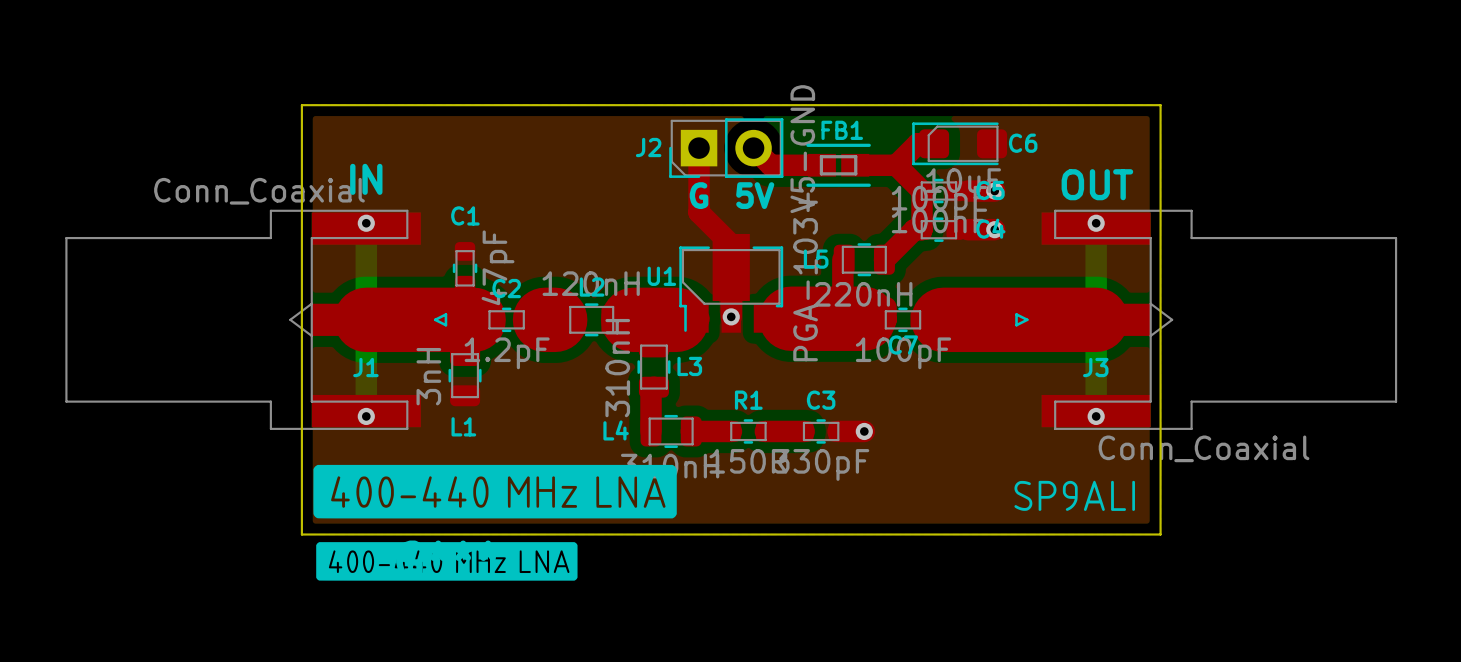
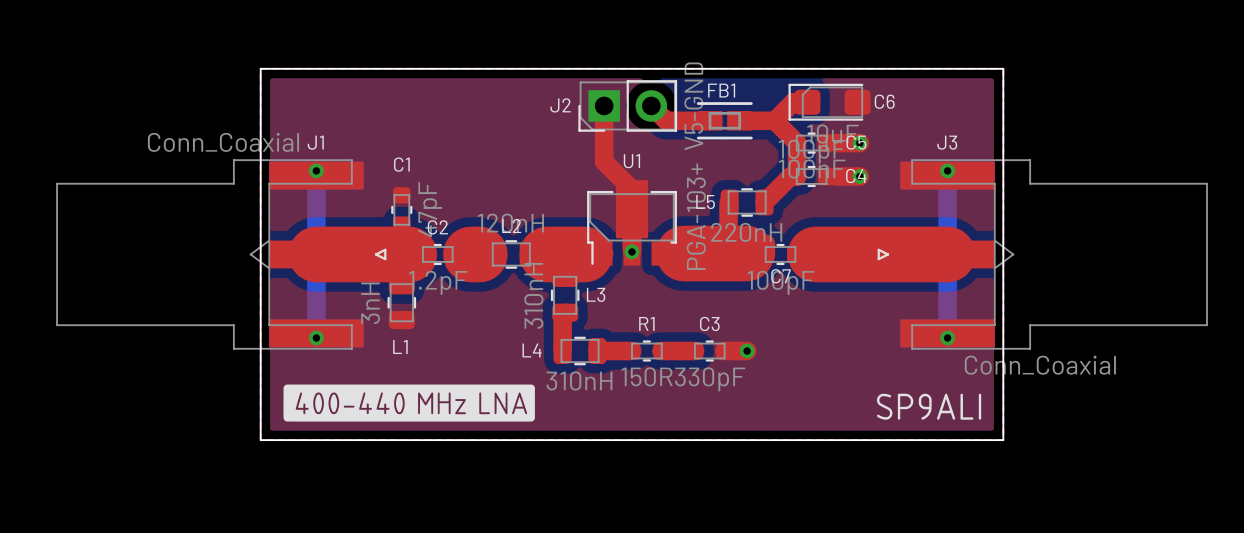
text: IN (366, 179) -> none
text: OUT (1097, 184) -> none
text: G (699, 195) -> none
text: 5V (755, 195) -> none
U1 name position: U1 (661, 276) -> U1 (631, 161)
J1 name position: J1 (365, 367) -> J1 (315, 142)
J3 name position: J3 (1095, 367) -> J3 (947, 142)
drawing shape: [313, 464, 677, 519] -> [283, 384, 535, 422]
part: (446, 561) -> none

